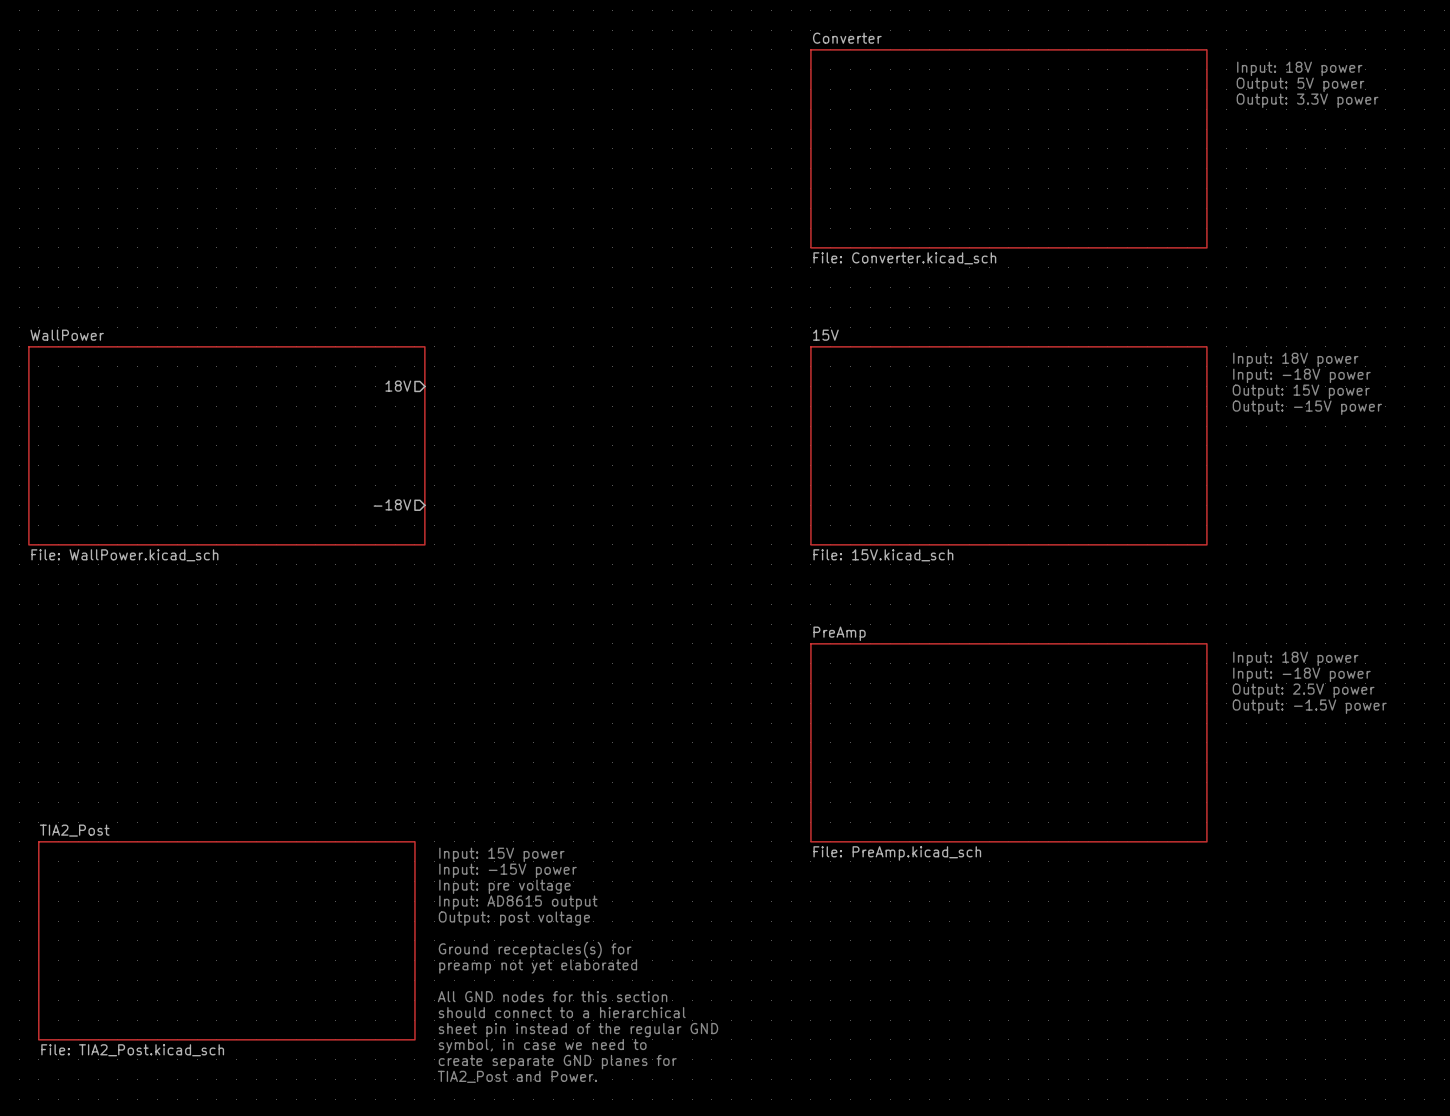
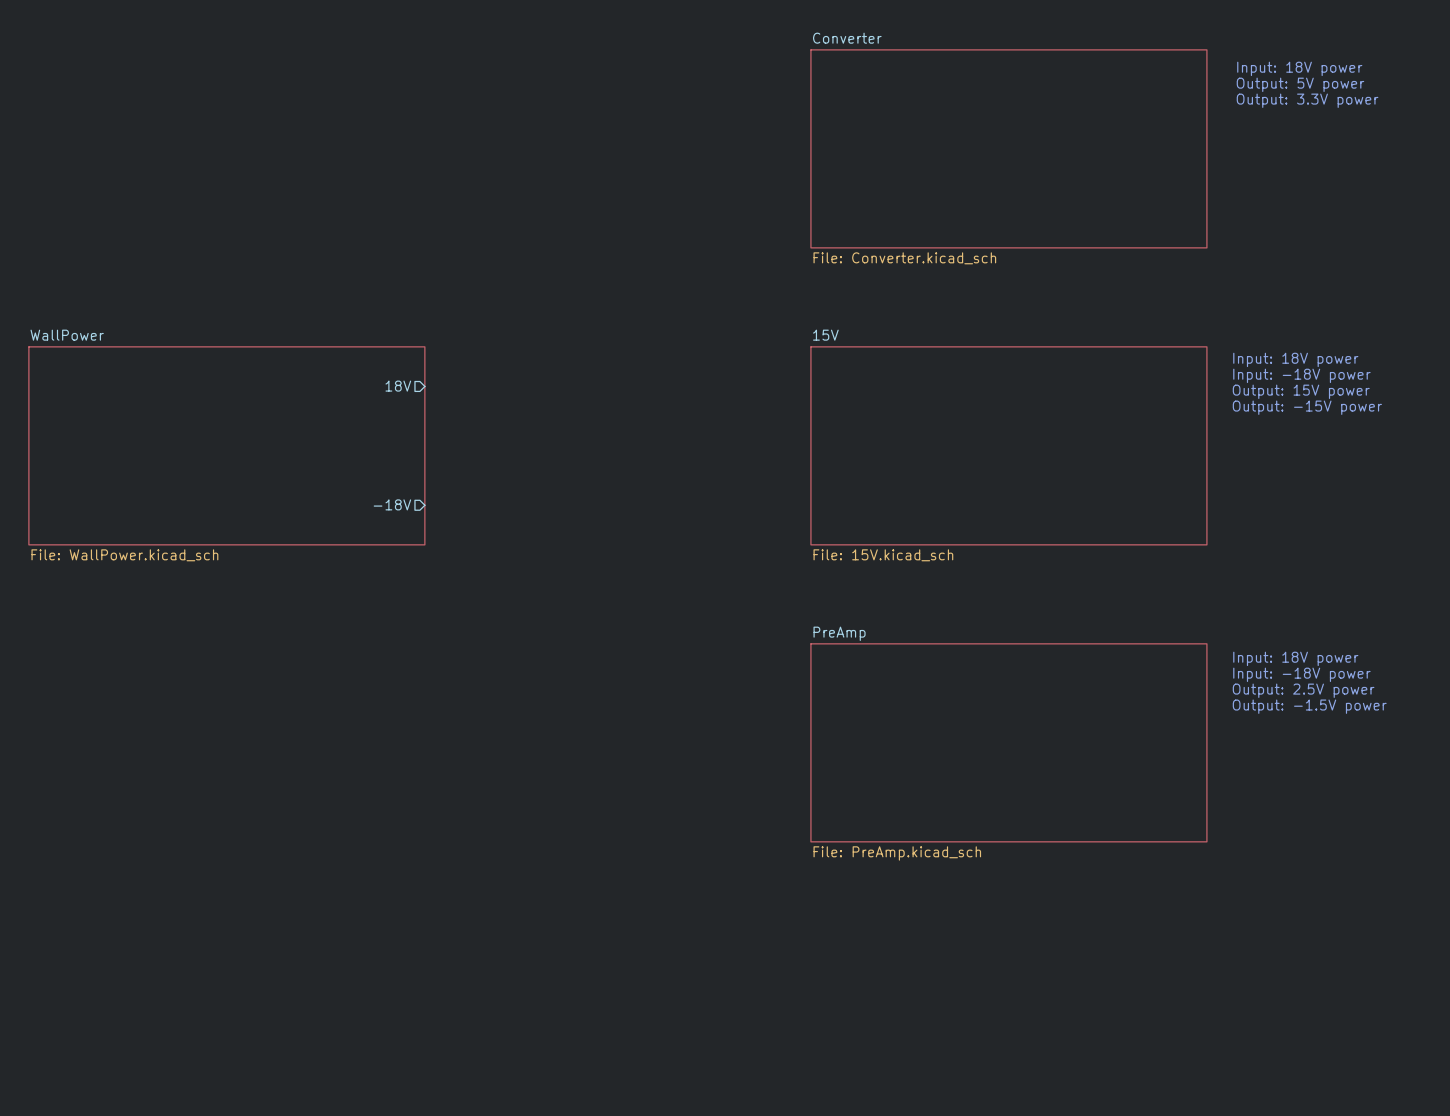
text: Input: 15V power (501, 854) -> none
text: Input: -15V power (508, 870) -> none
text: Input: pre voltage (504, 886) -> none
text: Input: AD8615 output (518, 902) -> none
text: Output: post voltage (514, 918) -> none
sheet TIA2_Post: File: TIA2_Post.kicad_sch (226, 940) -> none
text: Ground receptacles(s) for (535, 950) -> none
text: preamp not yet elaborated (538, 966) -> none
text: All GND nodes for this section (552, 996) -> none
text: should connect to a hierarchical (562, 1012) -> none
text: sheet pin instead of the regular GND (578, 1030) -> none
text: symbol, in case we need to (542, 1046) -> none
text: create separate GND planes for (557, 1062) -> none
text: TIA2_Post and Power. (517, 1076) -> none

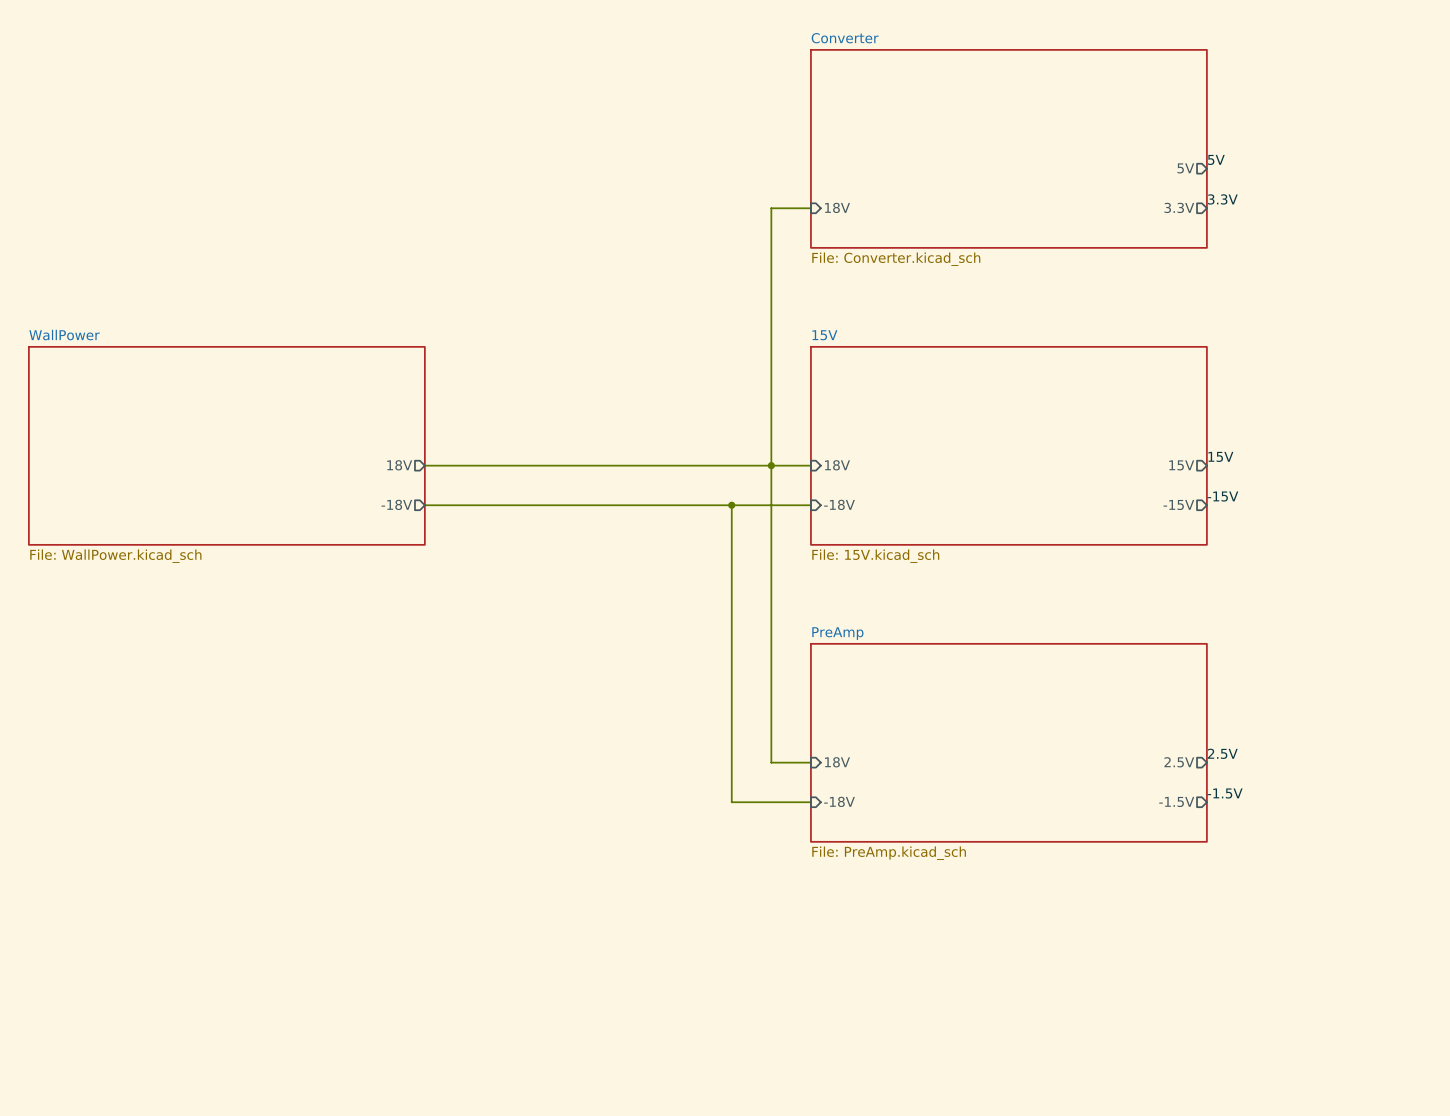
text: Input: 18V power (1299, 68) -> none
text: Output: 5V power (1300, 84) -> none
text: Output: 3.3V power (1307, 100) -> none
label: none -> 5V (1216, 159)
sheet pin: none -> 5V (1185, 168)
label: none -> 3.3V (1222, 199)
sheet pin: none -> 18V (837, 207)
sheet pin: none -> 3.3V (1179, 207)
wire: none -> (810, 208) (771, 208) (771, 762) (810, 762)
text: Input: 18V power (1295, 359) -> none
text: Input: -18V power (1301, 375) -> none
sheet pin position: 18V (398, 386) -> 18V (399, 465)
text: Output: 15V power (1301, 391) -> none
text: Output: -15V power (1307, 407) -> none
label: none -> 15V (1220, 456)
wire: none -> (424, 465) (810, 465)
junction: none -> (771, 465)
sheet pin: none -> 18V (837, 465)
sheet pin: none -> 15V (1181, 465)
label: none -> -15V (1222, 496)
sheet pin: none -> -18V (839, 504)
sheet pin: none -> -15V (1178, 504)
wire: none -> (424, 505) (810, 505)
wire: none -> (731, 505) (731, 802) (810, 802)
junction: none -> (731, 505)
text: Input: 18V power (1295, 658) -> none
text: Input: -18V power (1301, 674) -> none
text: Output: 2.5V power (1303, 690) -> none
text: Output: -1.5V power (1309, 706) -> none
label: none -> 2.5V (1222, 753)
sheet pin: none -> 18V (837, 762)
sheet pin: none -> 2.5V (1179, 762)
label: none -> -1.5V (1225, 793)
sheet pin: none -> -18V (839, 801)
sheet pin: none -> -1.5V (1176, 801)

